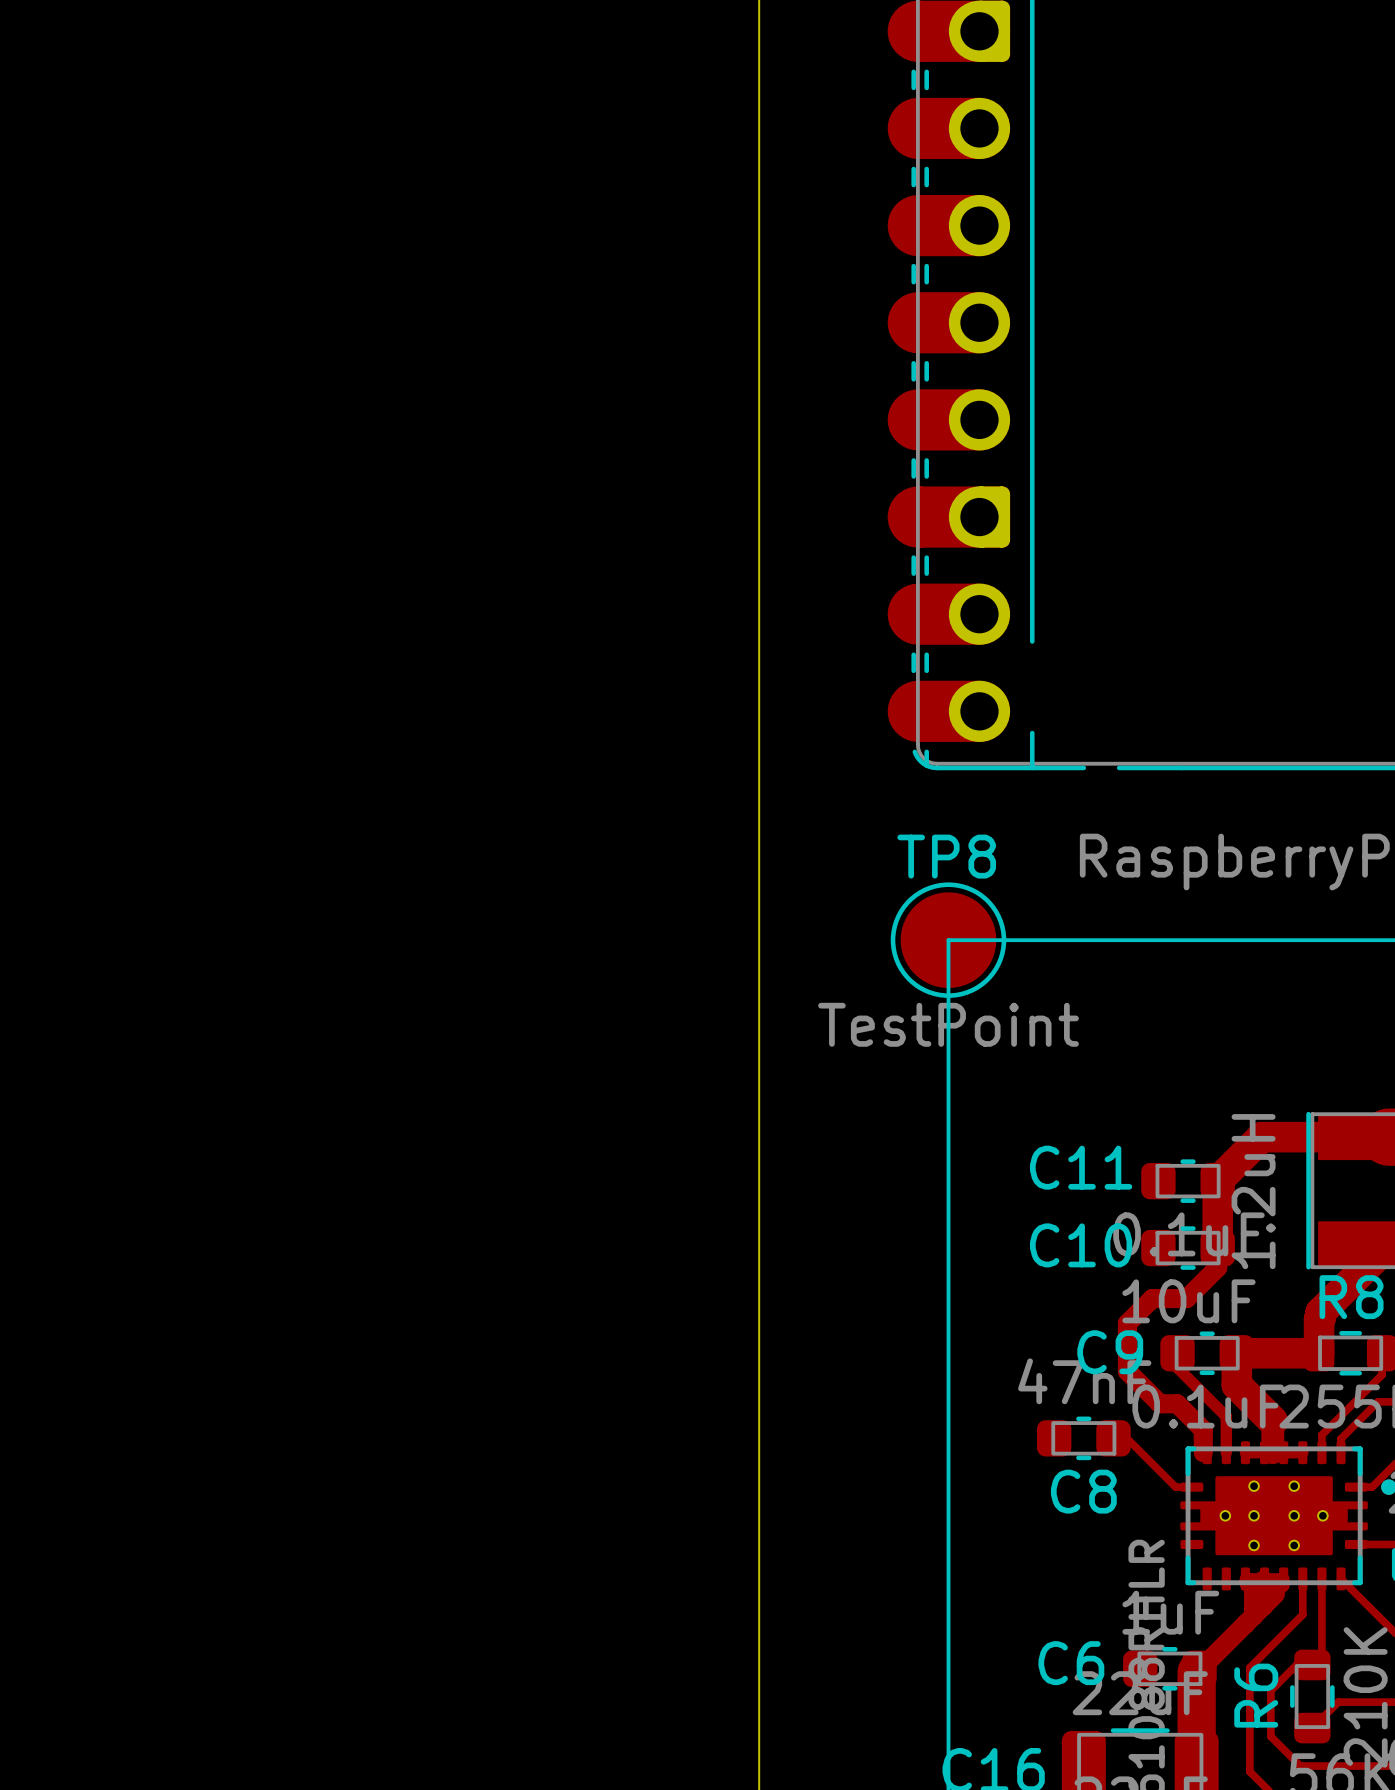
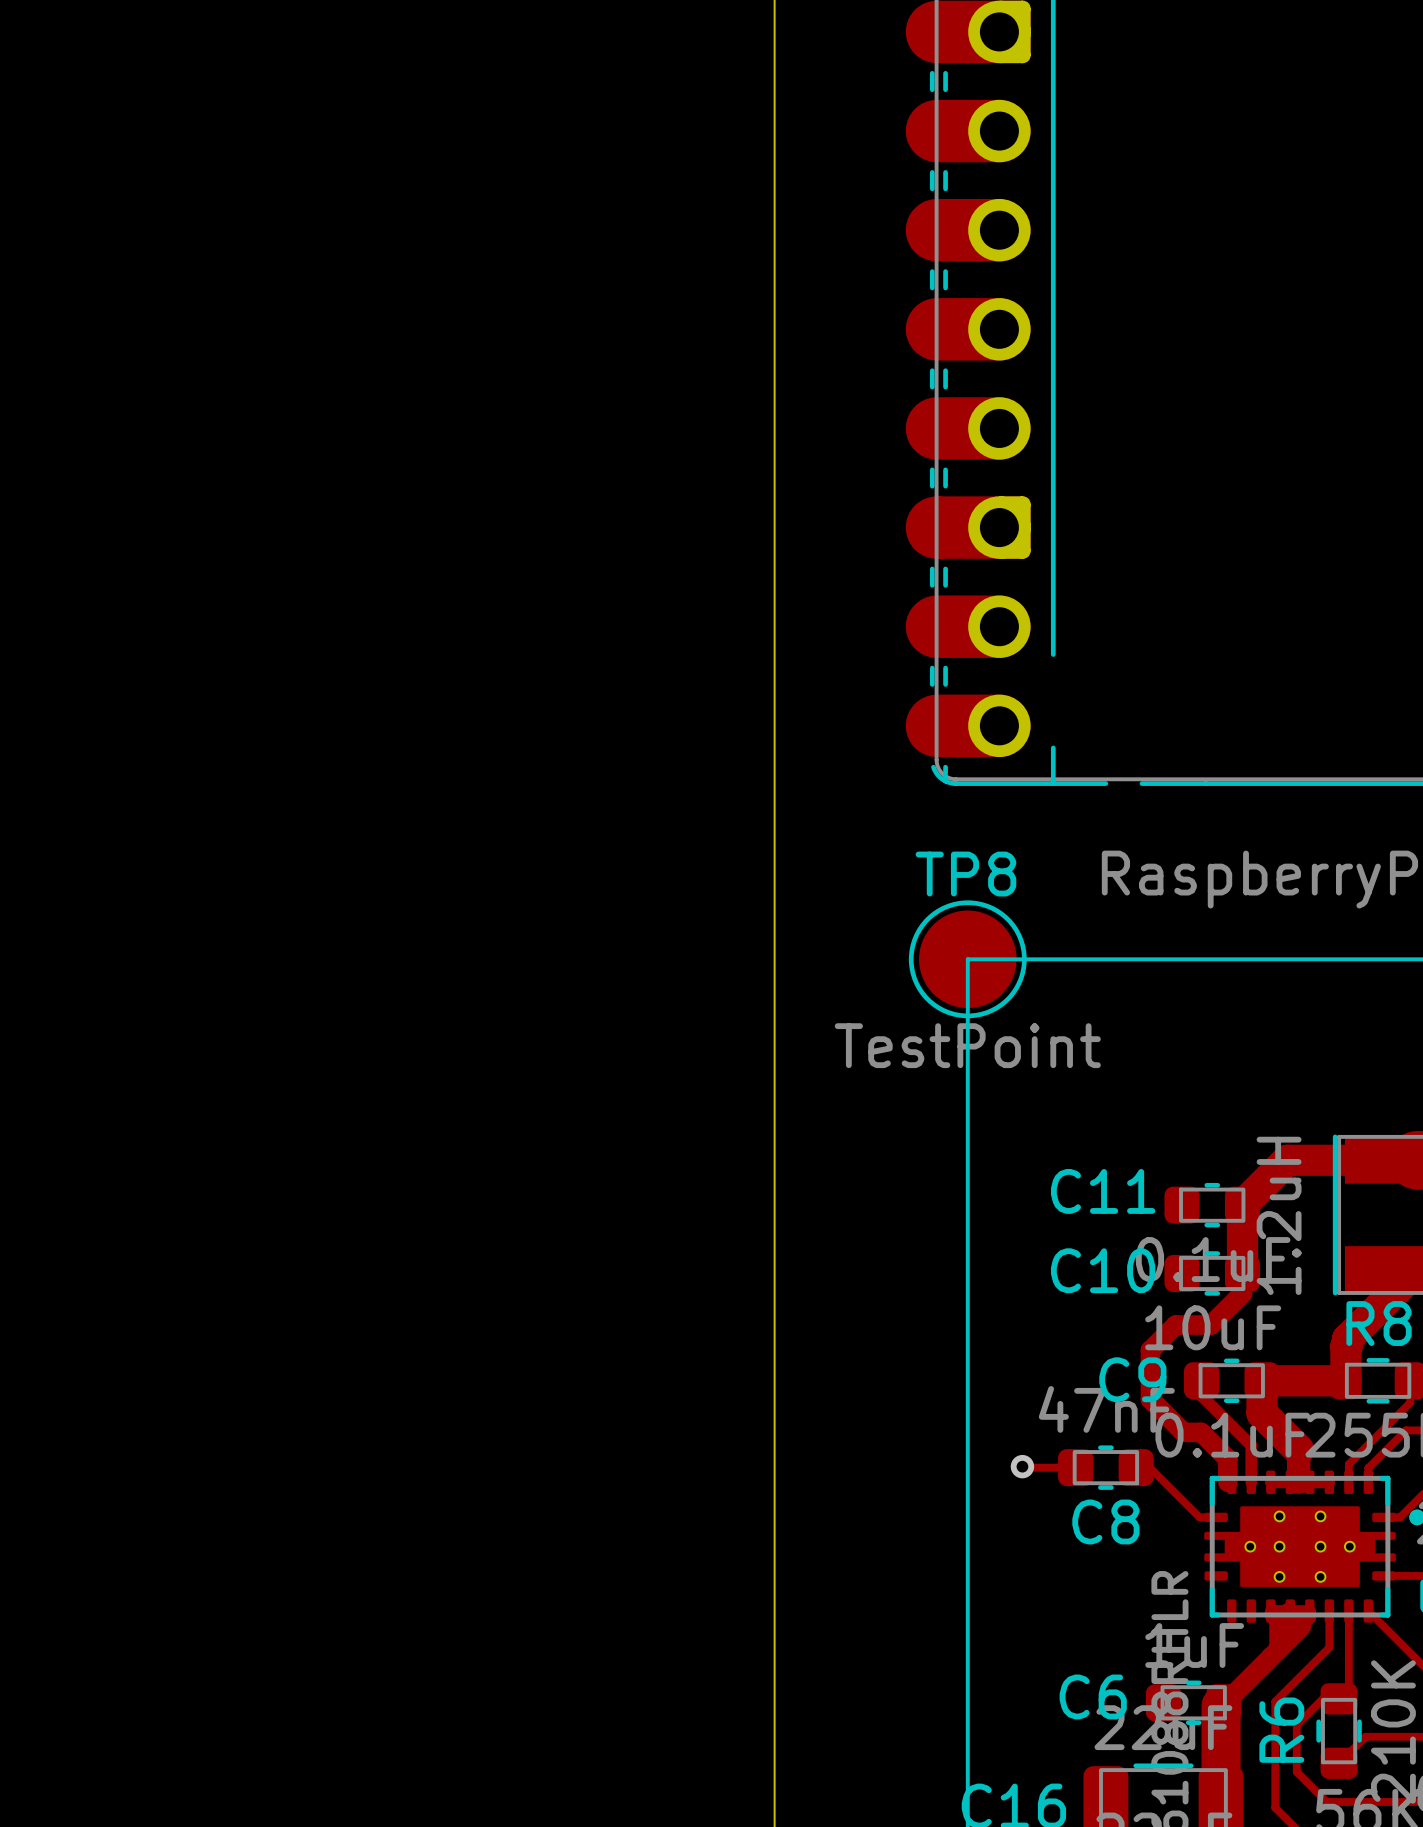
track: none -> (1022, 1466) (1075, 1467)
via: none -> (1022, 1466)

